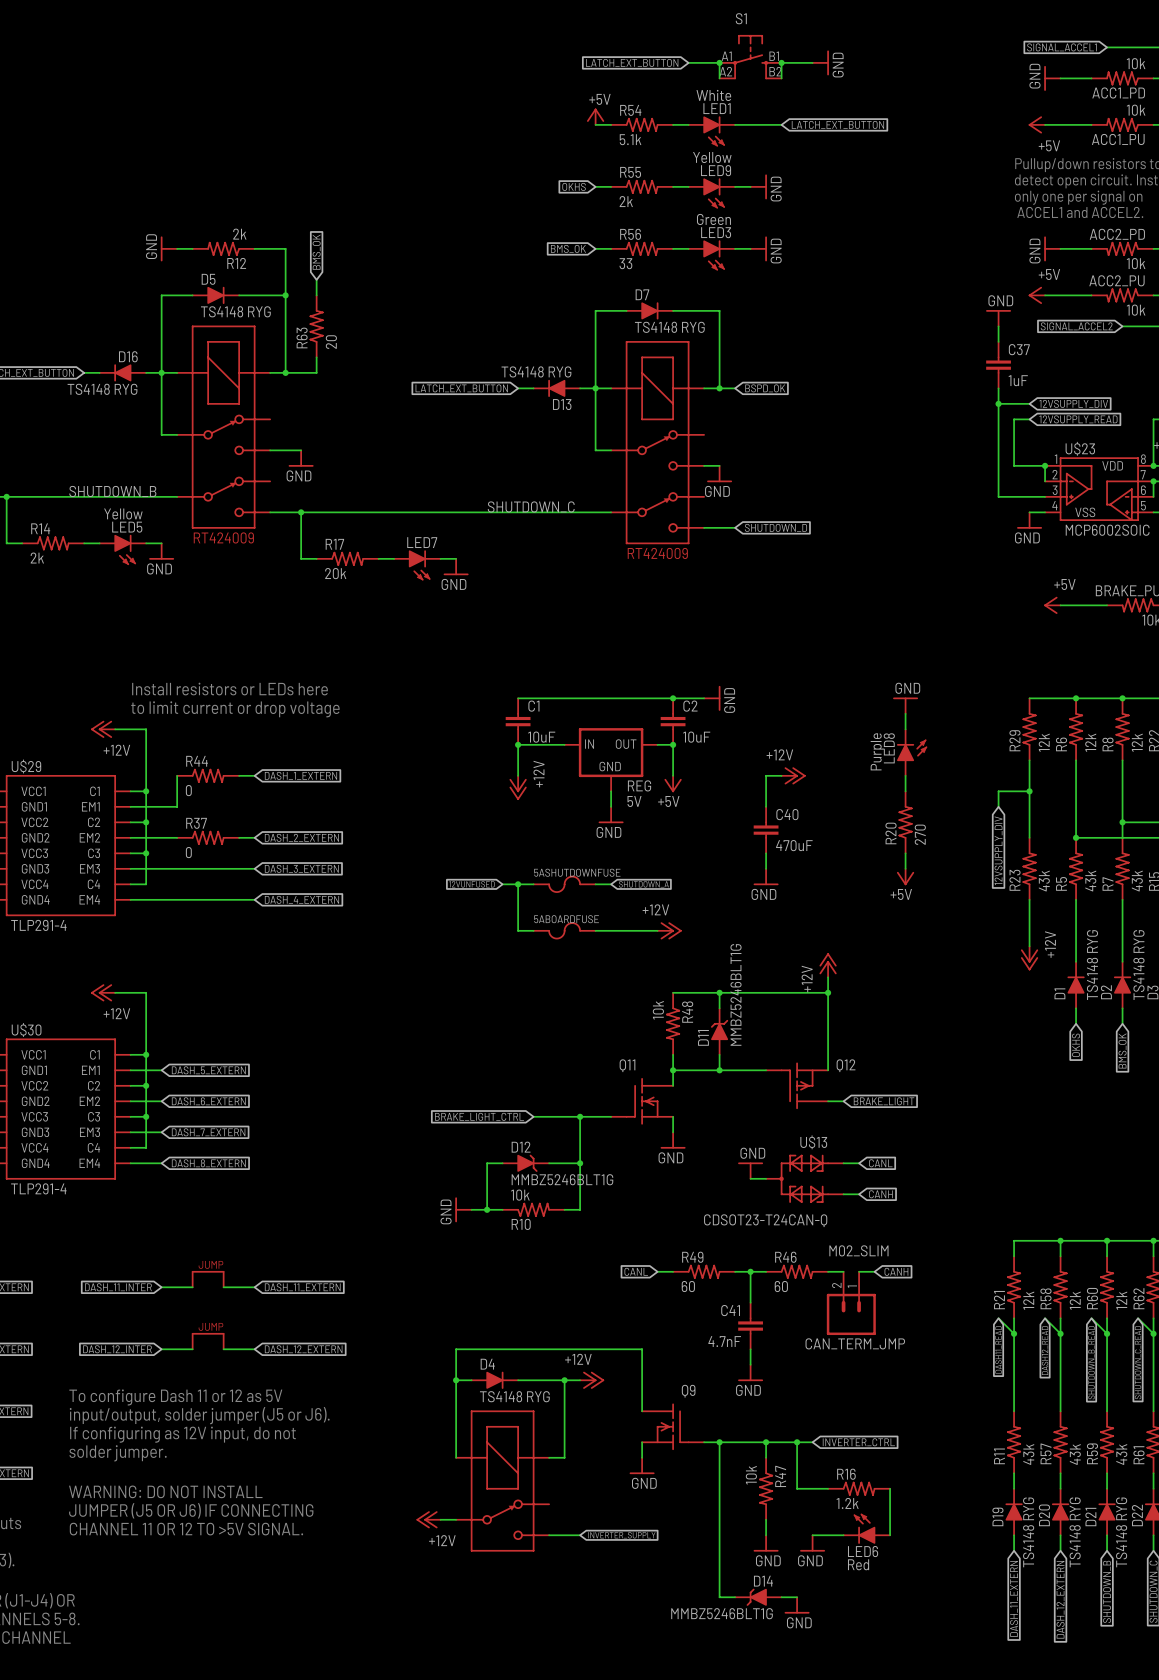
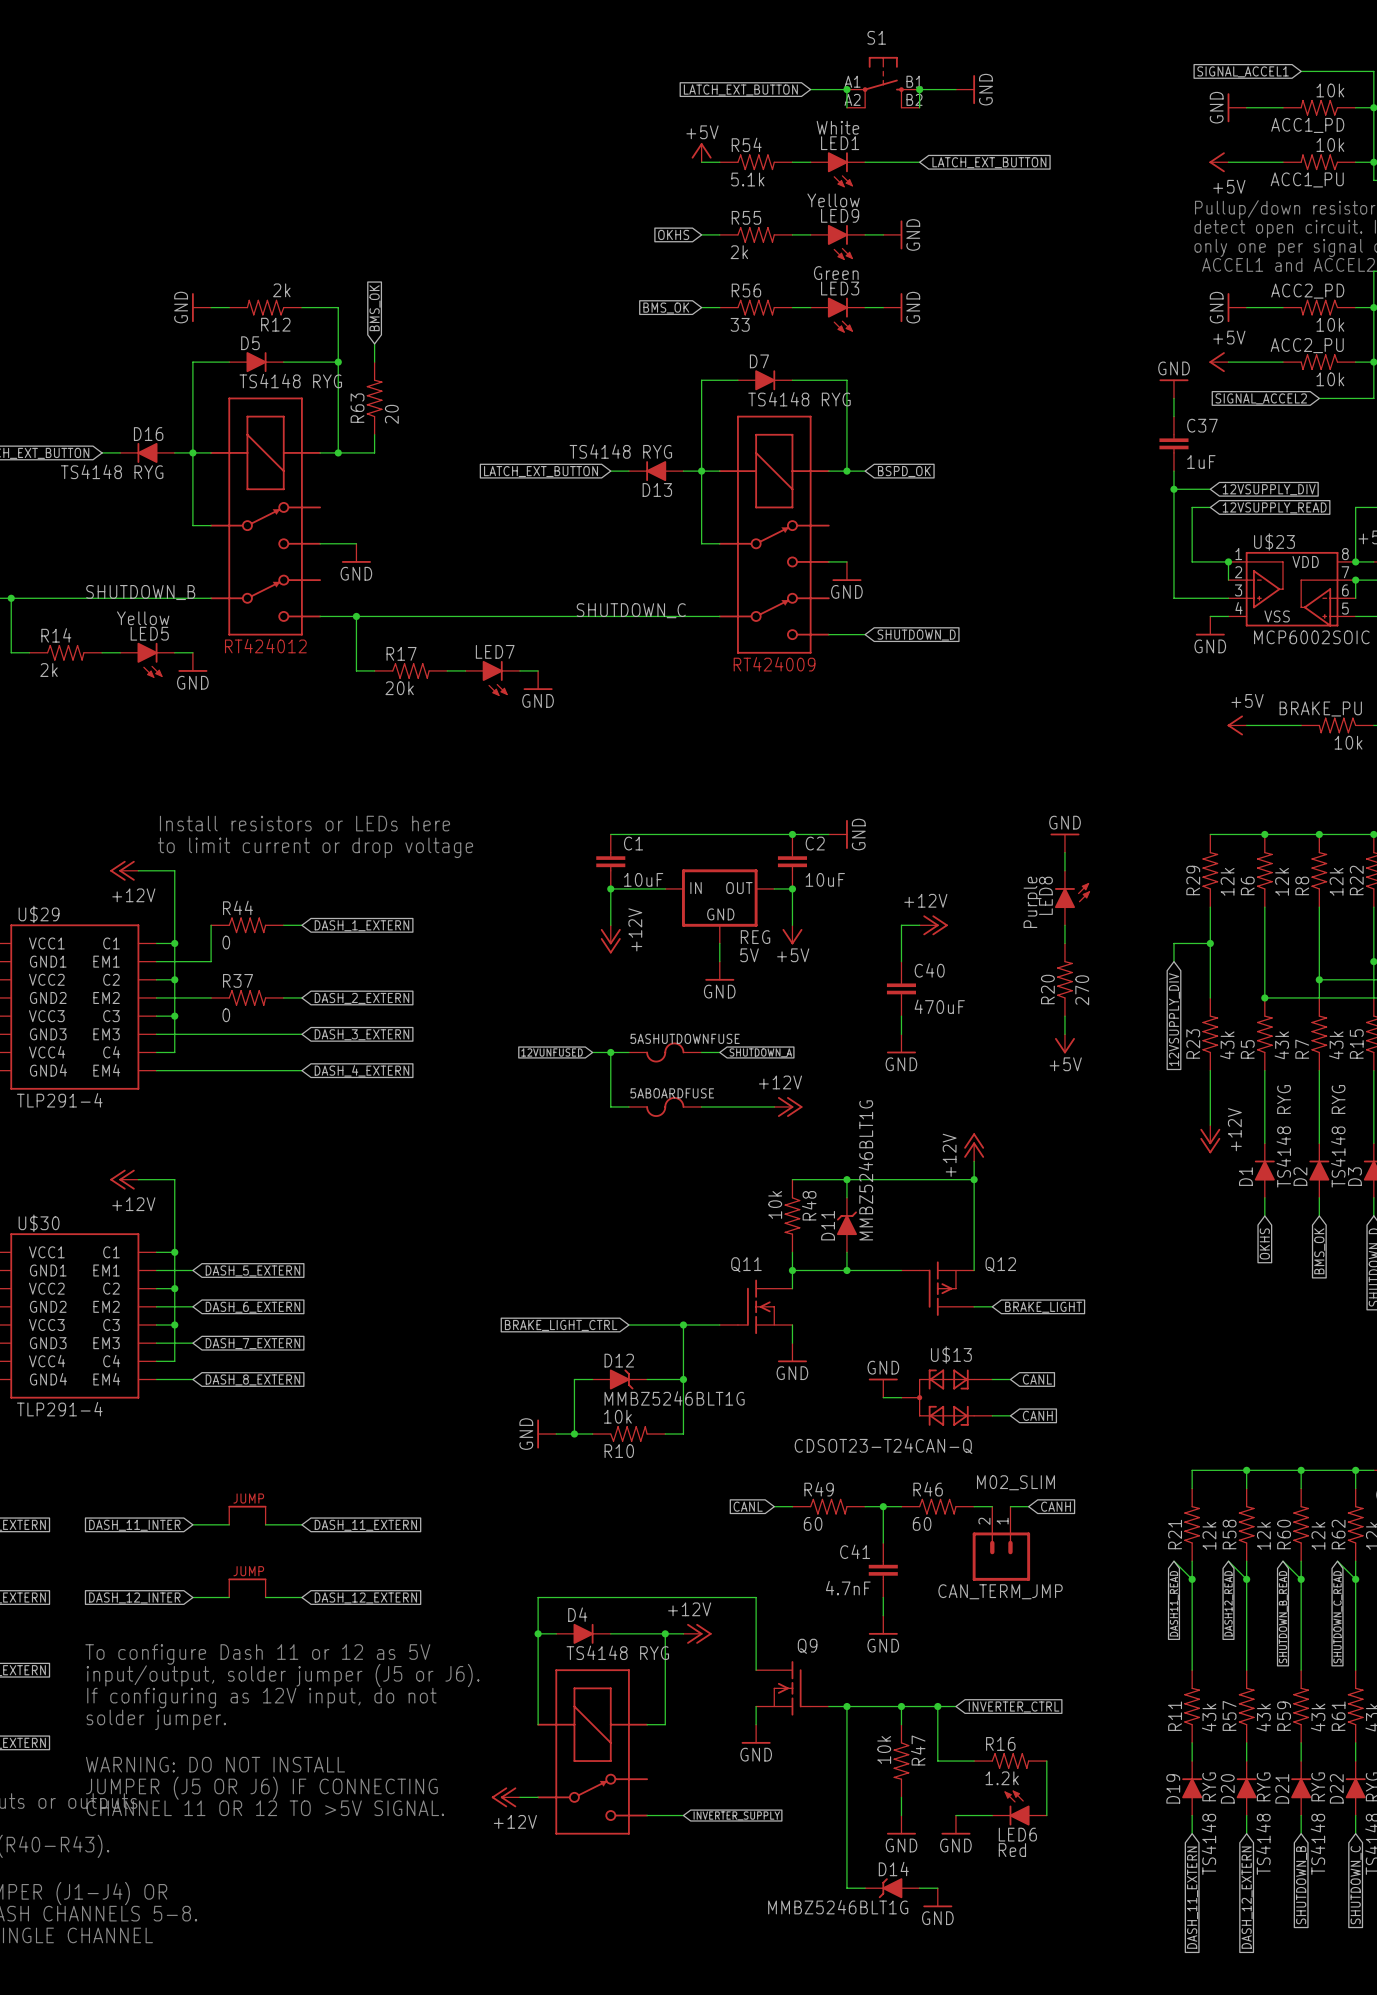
part value: RT424009 (223, 537) -> RT424012 (265, 646)

